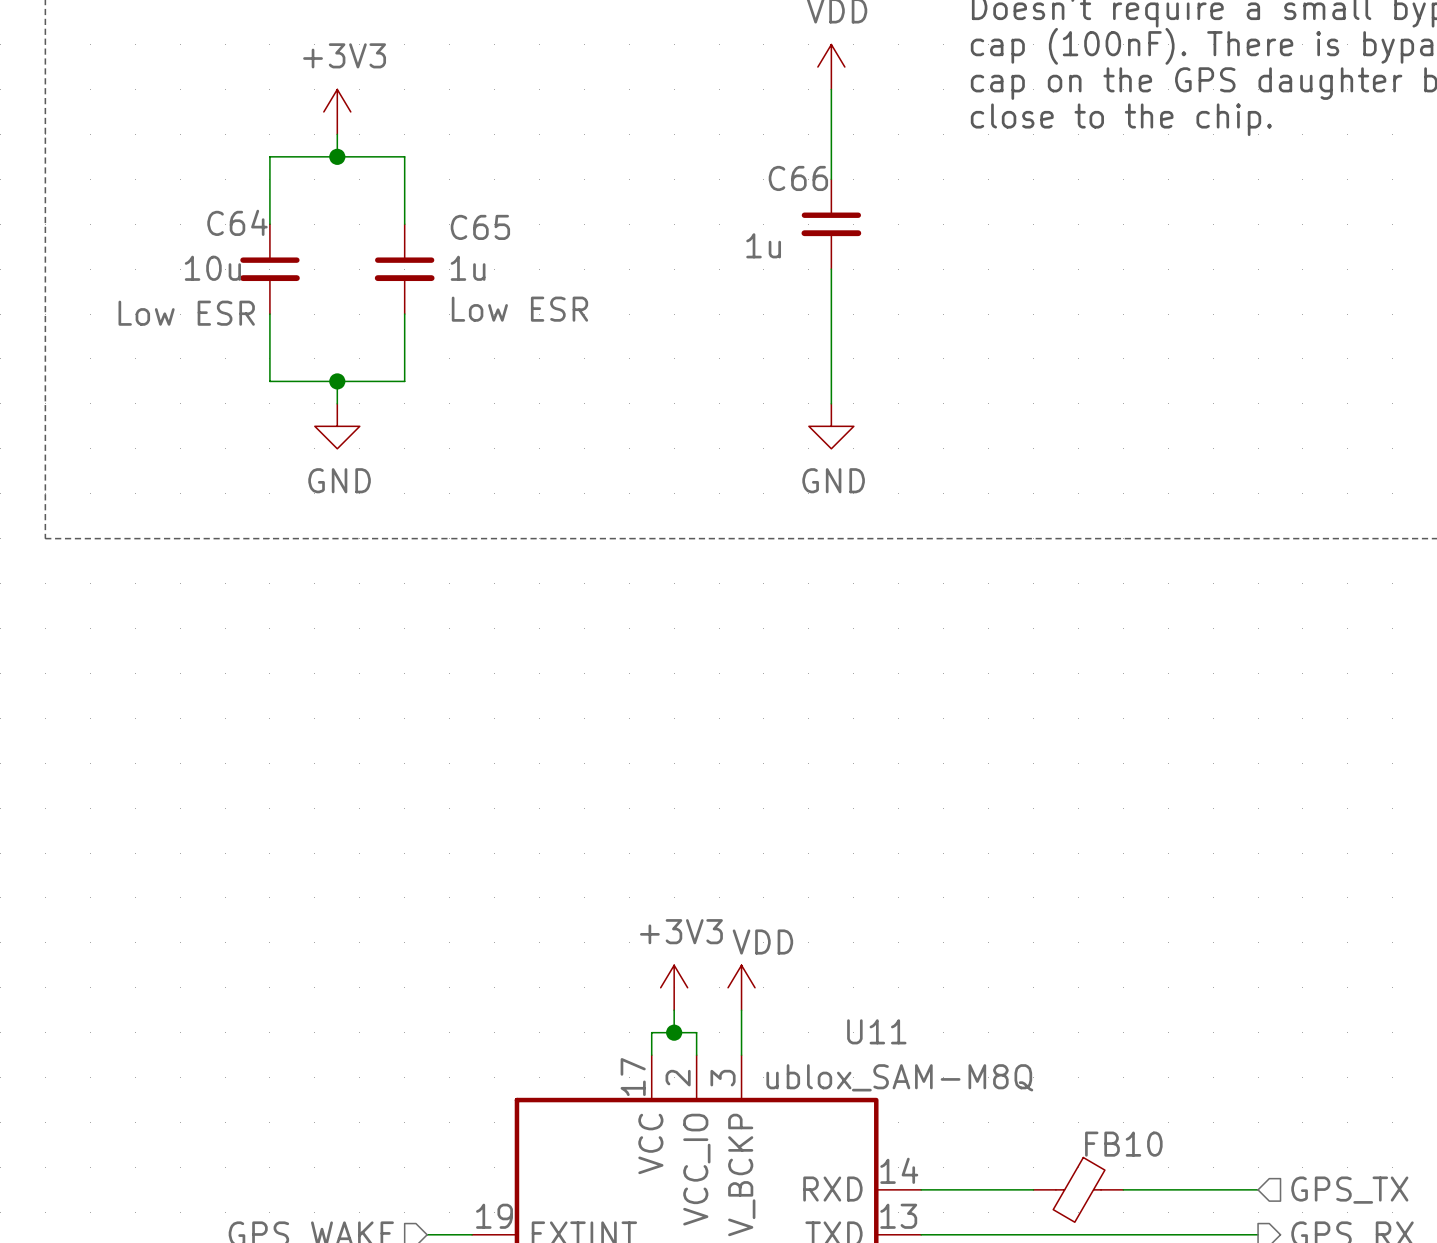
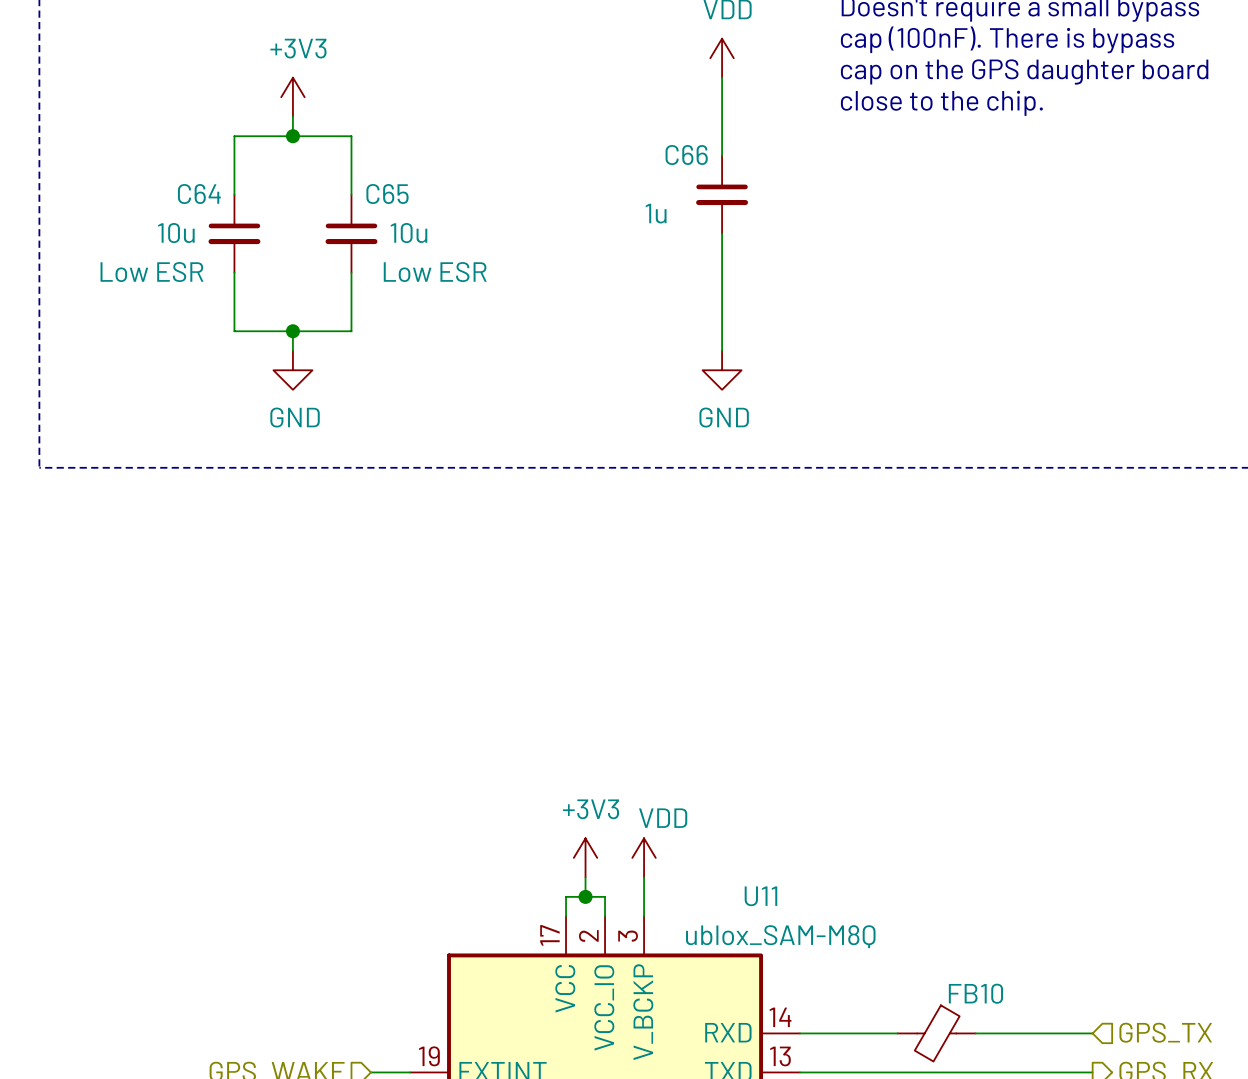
C65 name position: C65 (480, 227) -> C65 (387, 194)
C65 value: 1u (468, 268) -> 10u (408, 233)
C65 text position: Low ESR (519, 309) -> Low ESR (435, 272)

